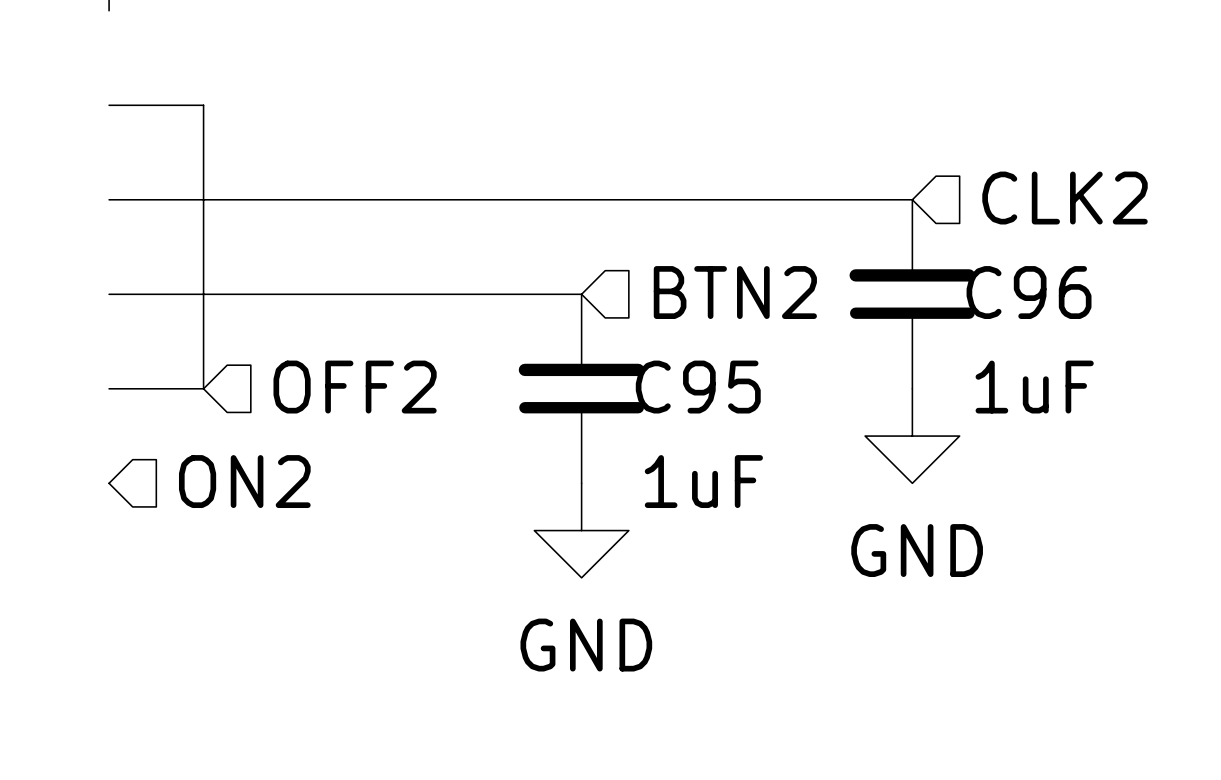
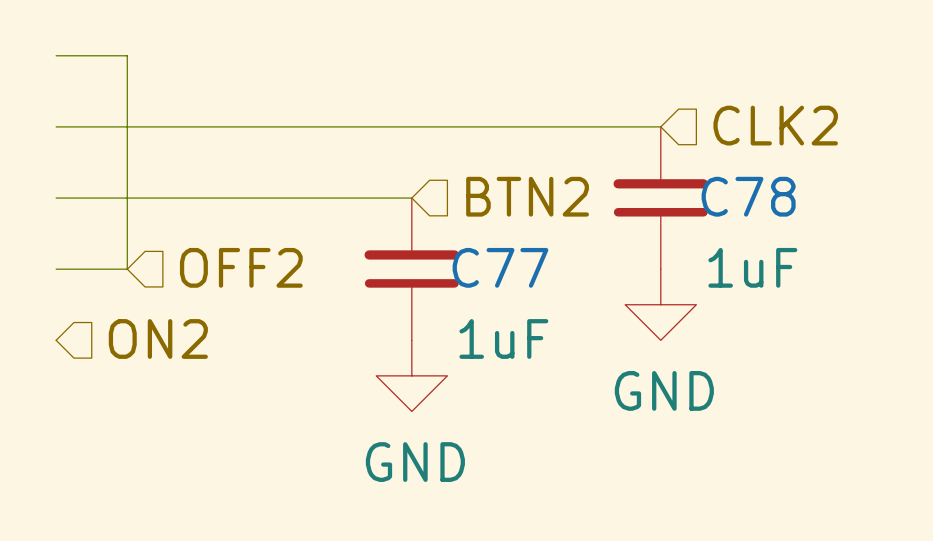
C96 name: C96 (1029, 292) -> C78 (748, 196)
C95 name: C95 (698, 387) -> C77 (500, 267)

